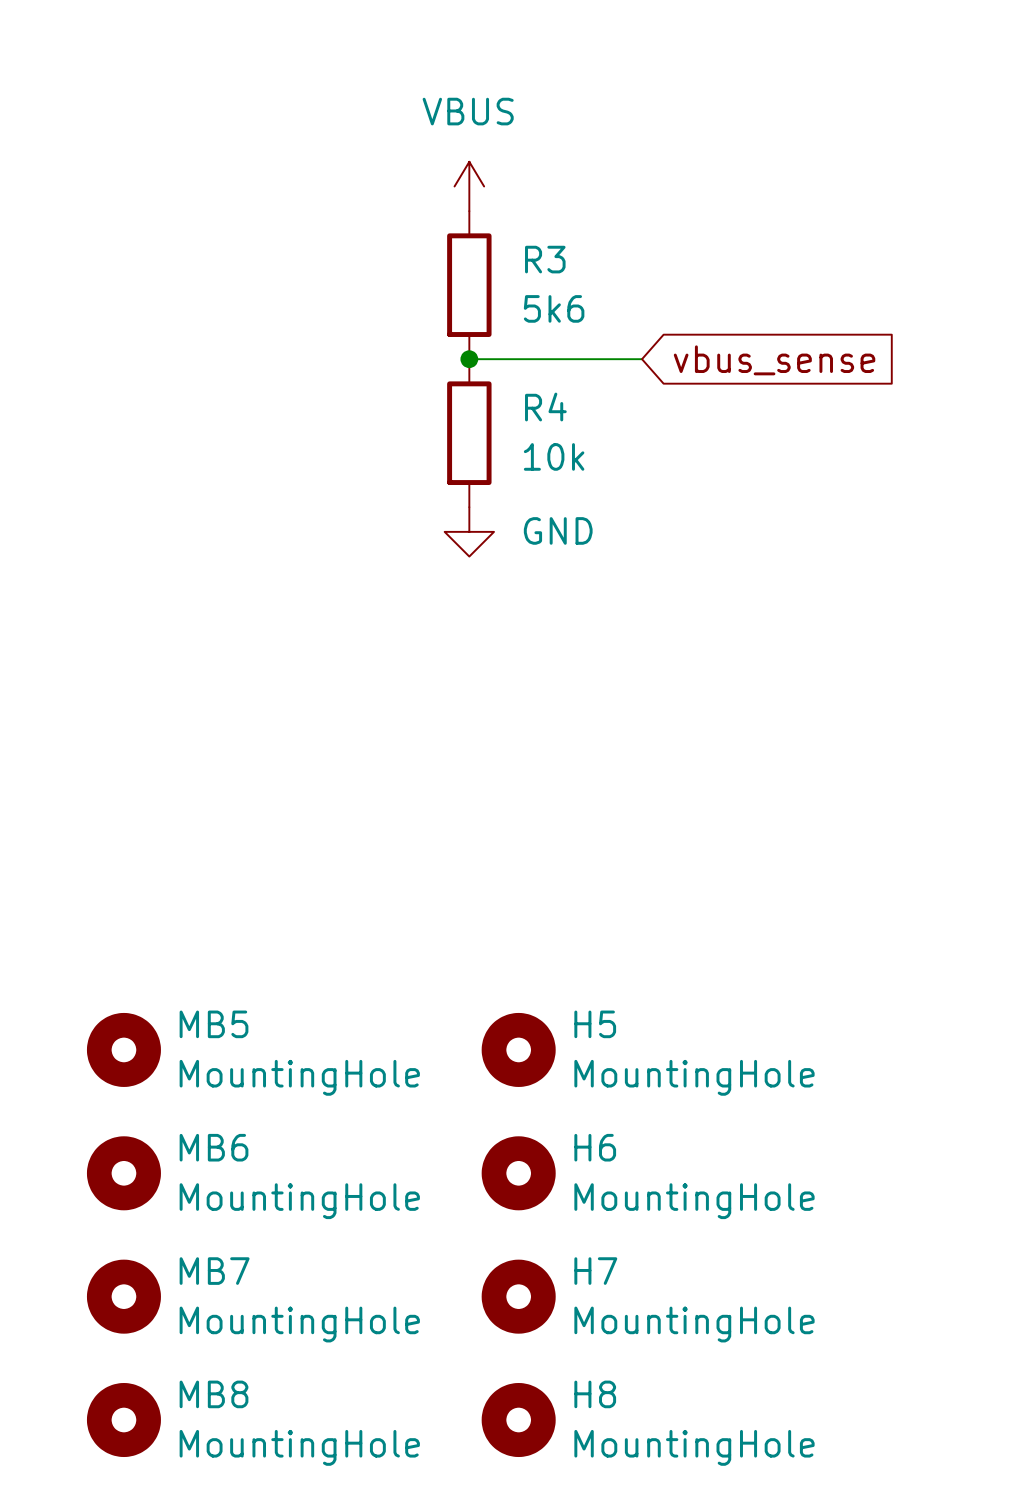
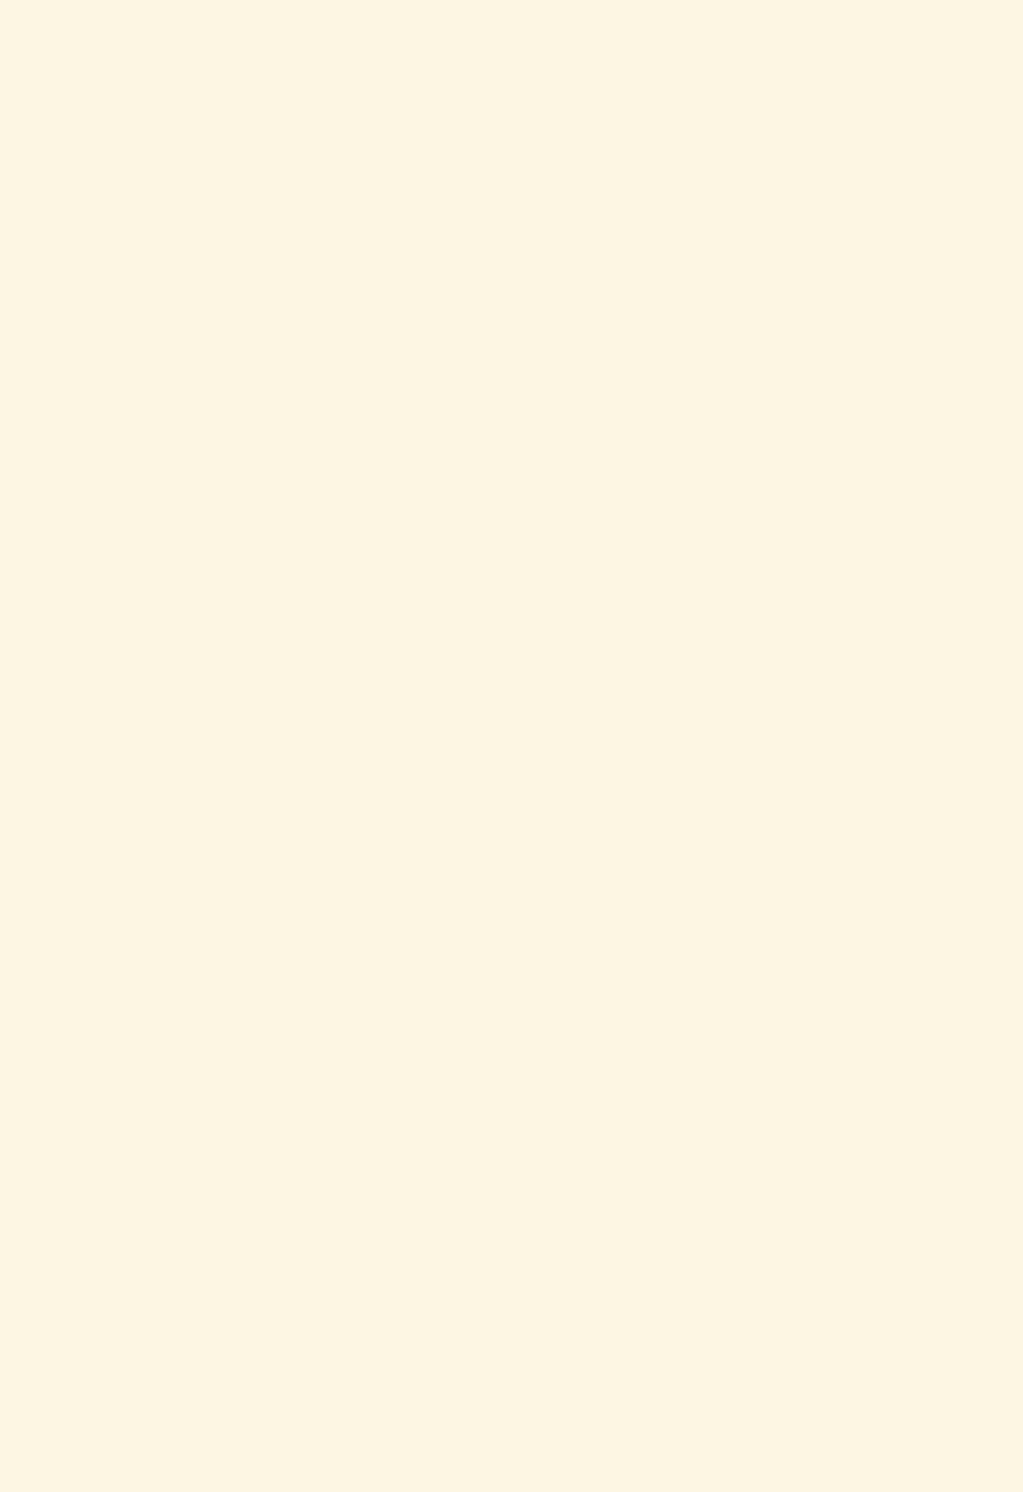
power symbol: VBUS (469, 186) -> none
R3: 5k6 (469, 285) -> none
wire: (469, 359) (642, 359) -> none
junction: (469, 359) -> none
global label: vbus_sense (774, 360) -> none
R4: 10k (469, 433) -> none
power symbol: GND (469, 531) -> none
MB5: MountingHole (123, 1049) -> none
H5: MountingHole (518, 1049) -> none
MB6: MountingHole (123, 1173) -> none
H6: MountingHole (518, 1173) -> none
MB7: MountingHole (123, 1296) -> none
H7: MountingHole (518, 1296) -> none
MB8: MountingHole (123, 1420) -> none
H8: MountingHole (518, 1420) -> none

